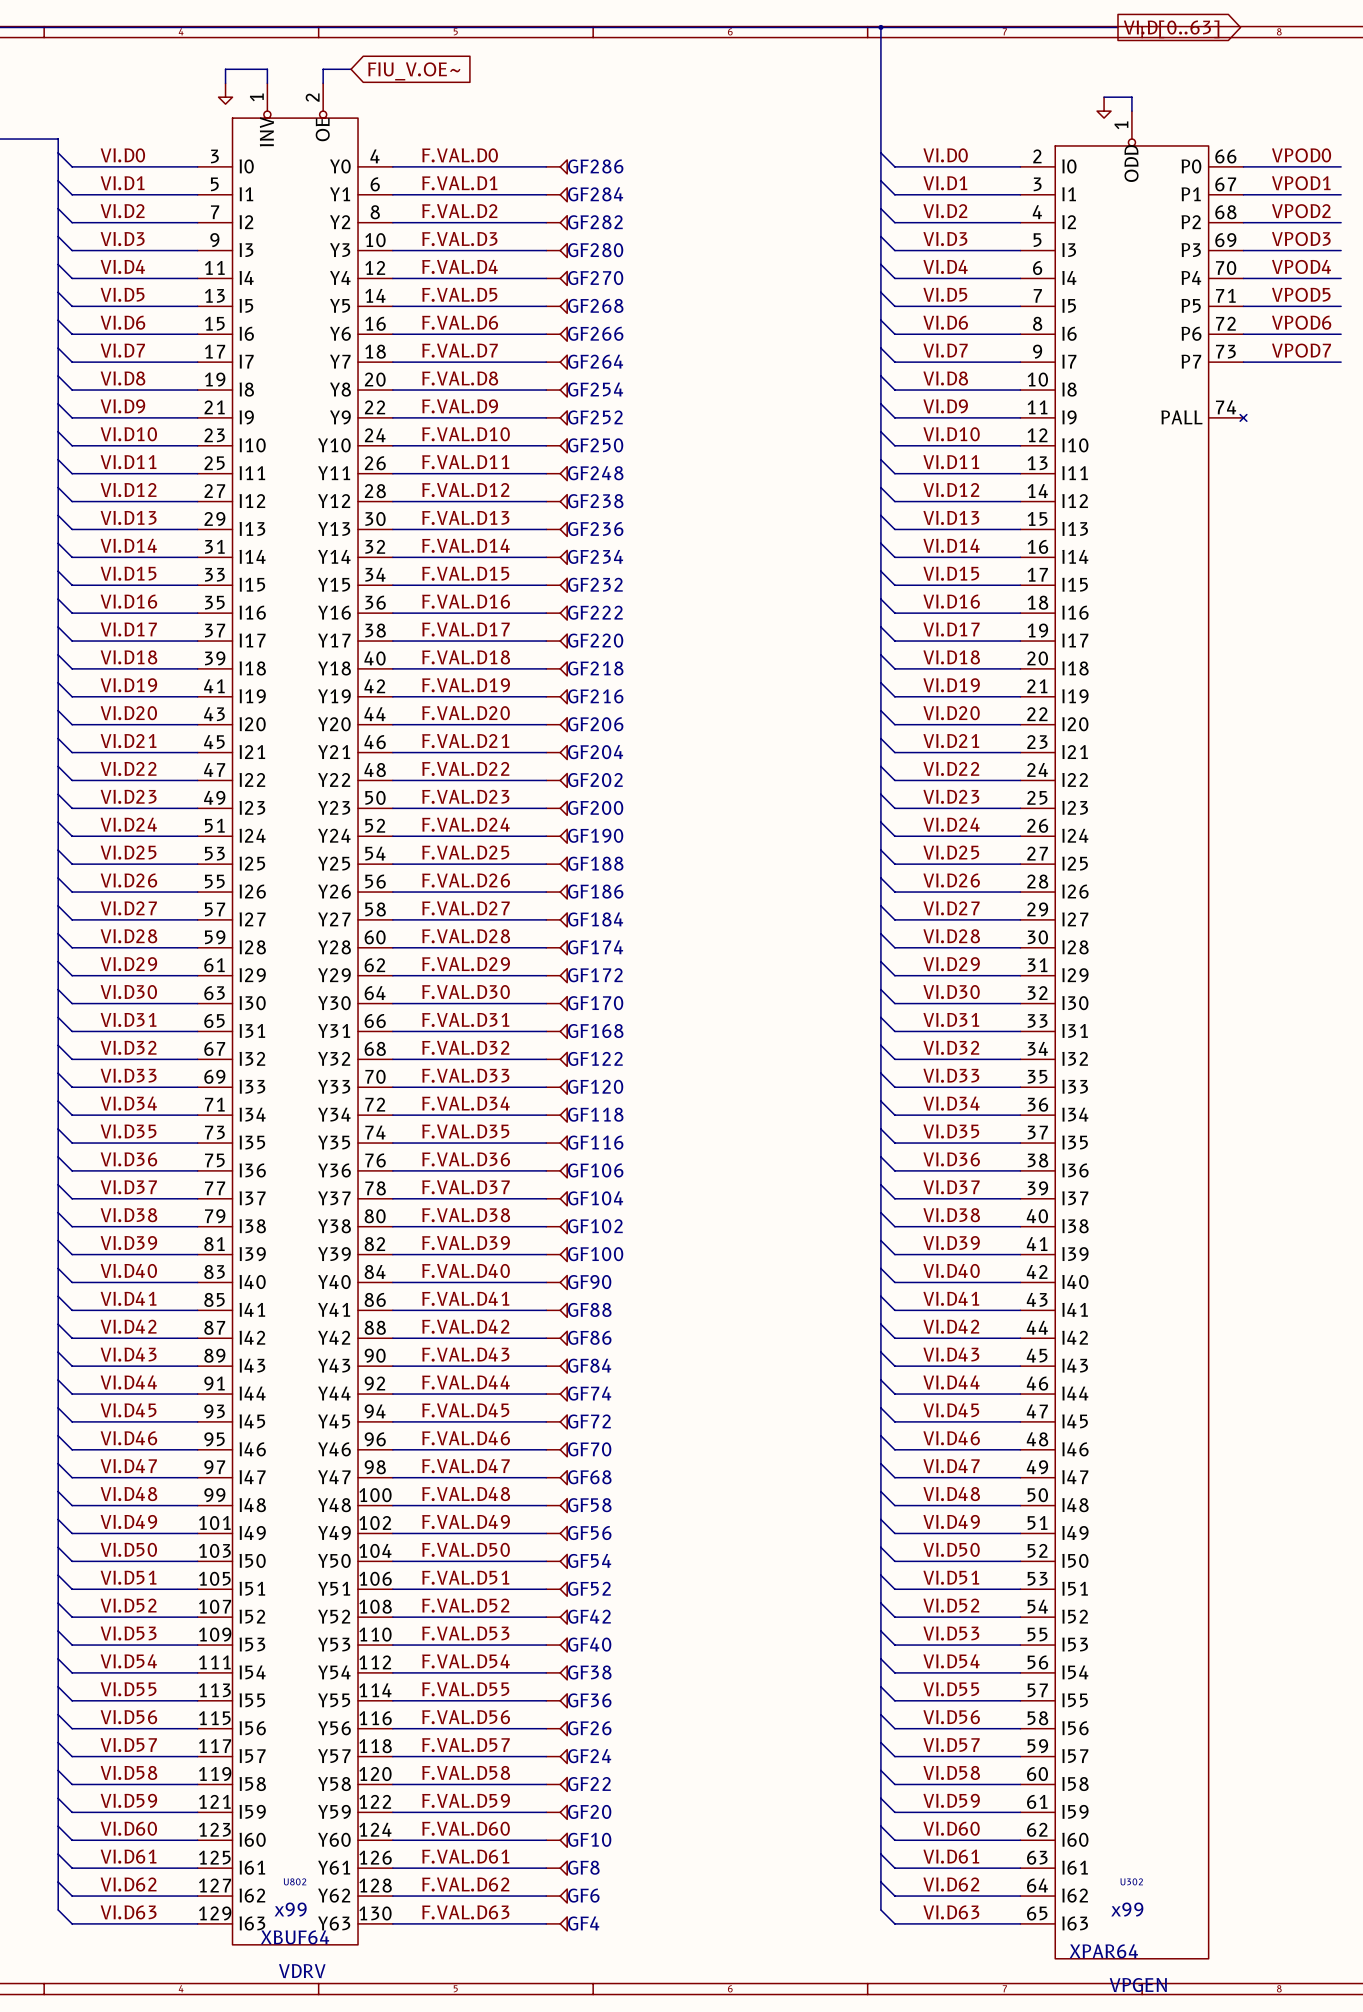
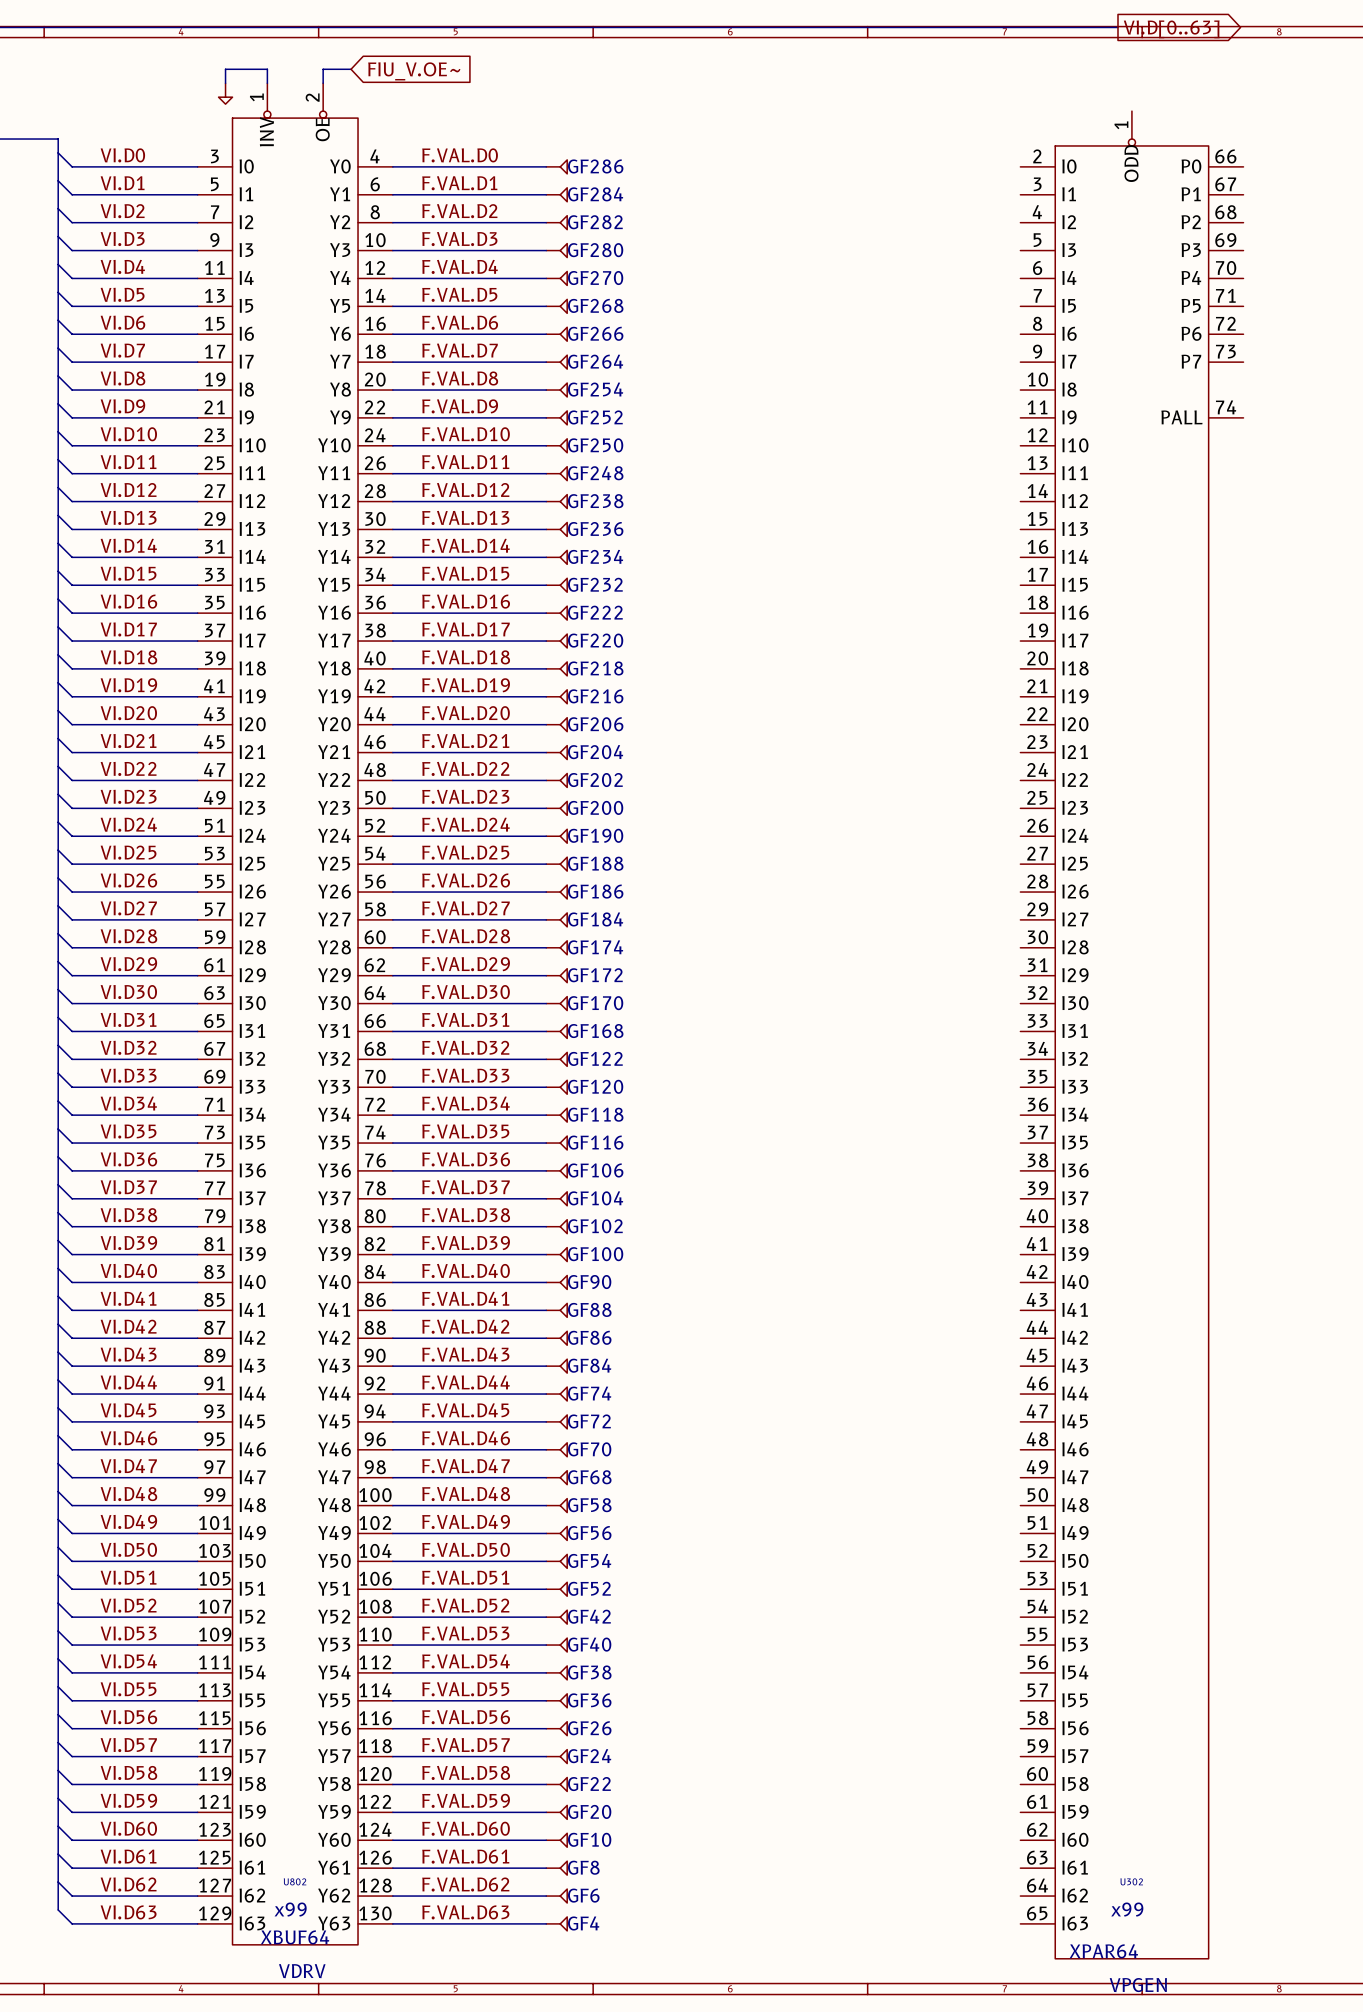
bus: (880, 27) (880, 1909) -> none
junction: (880, 27) -> none
wire: (1104, 97) (1131, 97) (1131, 111) -> none
power symbol: (1104, 107) -> none
wire: (880, 152) (894, 166) (1020, 166) -> none
label: VI.D0 (945, 155) -> none
label: VPOD0 (1301, 155) -> none
wire: (1243, 166) (1341, 166) -> none
wire: (880, 180) (894, 194) (1020, 194) -> none
label: VI.D1 (945, 183) -> none
label: VPOD1 (1301, 183) -> none
wire: (1243, 194) (1341, 194) -> none
wire: (880, 208) (894, 222) (1020, 222) -> none
label: VI.D2 (945, 211) -> none
label: VPOD2 (1301, 211) -> none
wire: (1243, 222) (1341, 222) -> none
wire: (880, 236) (894, 250) (1020, 250) -> none
label: VI.D3 (945, 239) -> none
label: VPOD3 (1301, 239) -> none
wire: (1243, 250) (1341, 250) -> none
wire: (880, 264) (894, 278) (1020, 278) -> none
label: VI.D4 (945, 266) -> none
label: VPOD4 (1301, 266) -> none
wire: (1243, 278) (1341, 278) -> none
wire: (880, 292) (894, 306) (1020, 306) -> none
label: VI.D5 (945, 294) -> none
label: VPOD5 (1301, 294) -> none
wire: (1243, 306) (1341, 306) -> none
wire: (880, 320) (894, 334) (1020, 334) -> none
label: VI.D6 (945, 322) -> none
label: VPOD6 (1301, 322) -> none
wire: (1243, 334) (1341, 334) -> none
wire: (880, 348) (894, 362) (1020, 362) -> none
label: VI.D7 (945, 350) -> none
label: VPOD7 (1301, 350) -> none
wire: (1243, 362) (1341, 362) -> none
wire: (880, 376) (894, 390) (1020, 390) -> none
label: VI.D8 (945, 378) -> none
wire: (880, 403) (894, 417) (1020, 417) -> none
label: VI.D9 (945, 406) -> none
no-connect mark: (1243, 417) -> none
wire: (880, 431) (894, 445) (1020, 445) -> none
label: VI.D10 (951, 434) -> none
wire: (880, 459) (894, 473) (1020, 473) -> none
label: VI.D11 (951, 462) -> none
wire: (880, 487) (894, 501) (1020, 501) -> none
label: VI.D12 (951, 490) -> none
wire: (880, 515) (894, 529) (1020, 529) -> none
label: VI.D13 (951, 517) -> none
wire: (880, 543) (894, 557) (1020, 557) -> none
label: VI.D14 (951, 545) -> none
wire: (880, 571) (894, 585) (1020, 585) -> none
label: VI.D15 (951, 573) -> none
wire: (880, 599) (894, 613) (1020, 613) -> none
label: VI.D16 (951, 601) -> none
wire: (880, 627) (894, 641) (1020, 641) -> none
label: VI.D17 (951, 629) -> none
wire: (880, 654) (894, 668) (1020, 668) -> none
label: VI.D18 (951, 657) -> none
wire: (880, 682) (894, 696) (1020, 696) -> none
label: VI.D19 (951, 685) -> none
wire: (880, 710) (894, 724) (1020, 724) -> none
label: VI.D20 (951, 713) -> none
wire: (880, 738) (894, 752) (1020, 752) -> none
label: VI.D21 (951, 741) -> none
wire: (880, 766) (894, 780) (1020, 780) -> none
label: VI.D22 (951, 768) -> none
wire: (880, 794) (894, 808) (1020, 808) -> none
label: VI.D23 (951, 796) -> none
wire: (880, 822) (894, 836) (1020, 836) -> none
label: VI.D24 (951, 824) -> none
wire: (880, 850) (894, 864) (1020, 864) -> none
label: VI.D25 (951, 852) -> none
wire: (880, 878) (894, 892) (1020, 892) -> none
label: VI.D26 (951, 880) -> none
wire: (880, 905) (894, 919) (1020, 919) -> none
label: VI.D27 (951, 908) -> none
wire: (880, 933) (894, 947) (1020, 947) -> none
label: VI.D28 (951, 936) -> none
wire: (880, 961) (894, 975) (1020, 975) -> none
label: VI.D29 (951, 964) -> none
wire: (880, 989) (894, 1003) (1020, 1003) -> none
label: VI.D30 (951, 992) -> none
wire: (880, 1017) (894, 1031) (1020, 1031) -> none
label: VI.D31 (951, 1019) -> none
wire: (880, 1045) (894, 1059) (1020, 1059) -> none
label: VI.D32 (951, 1047) -> none
wire: (880, 1073) (894, 1087) (1020, 1087) -> none
label: VI.D33 (951, 1075) -> none
wire: (880, 1101) (894, 1115) (1020, 1115) -> none
label: VI.D34 (951, 1103) -> none
wire: (880, 1129) (894, 1143) (1020, 1143) -> none
label: VI.D35 (951, 1131) -> none
wire: (880, 1156) (894, 1170) (1020, 1170) -> none
label: VI.D36 (951, 1159) -> none
wire: (880, 1184) (894, 1198) (1020, 1198) -> none
label: VI.D37 (951, 1187) -> none
wire: (880, 1212) (894, 1226) (1020, 1226) -> none
label: VI.D38 (951, 1215) -> none
wire: (880, 1240) (894, 1254) (1020, 1254) -> none
label: VI.D39 (951, 1243) -> none
wire: (880, 1268) (894, 1282) (1020, 1282) -> none
label: VI.D40 (951, 1270) -> none
wire: (880, 1296) (894, 1310) (1020, 1310) -> none
label: VI.D41 (951, 1298) -> none
wire: (880, 1324) (894, 1338) (1020, 1338) -> none
label: VI.D42 (951, 1326) -> none
wire: (880, 1352) (894, 1366) (1020, 1366) -> none
label: VI.D43 (951, 1354) -> none
wire: (880, 1380) (894, 1394) (1020, 1394) -> none
label: VI.D44 (951, 1382) -> none
wire: (880, 1407) (894, 1421) (1020, 1421) -> none
label: VI.D45 (951, 1410) -> none
wire: (880, 1435) (894, 1449) (1020, 1449) -> none
label: VI.D46 (951, 1438) -> none
wire: (880, 1463) (894, 1477) (1020, 1477) -> none
label: VI.D47 (951, 1466) -> none
wire: (880, 1491) (894, 1505) (1020, 1505) -> none
label: VI.D48 (951, 1494) -> none
wire: (880, 1519) (894, 1533) (1020, 1533) -> none
label: VI.D49 (951, 1521) -> none
wire: (880, 1547) (894, 1561) (1020, 1561) -> none
label: VI.D50 (951, 1549) -> none
wire: (880, 1575) (894, 1589) (1020, 1589) -> none
label: VI.D51 (951, 1577) -> none
wire: (880, 1603) (894, 1617) (1020, 1617) -> none
label: VI.D52 (951, 1605) -> none
wire: (880, 1631) (894, 1645) (1020, 1645) -> none
label: VI.D53 (951, 1633) -> none
wire: (880, 1658) (894, 1672) (1020, 1672) -> none
label: VI.D54 (951, 1661) -> none
wire: (880, 1686) (894, 1700) (1020, 1700) -> none
label: VI.D55 (951, 1689) -> none
wire: (880, 1714) (894, 1728) (1020, 1728) -> none
label: VI.D56 (951, 1717) -> none
wire: (880, 1742) (894, 1756) (1020, 1756) -> none
label: VI.D57 (951, 1745) -> none
wire: (880, 1770) (894, 1784) (1020, 1784) -> none
label: VI.D58 (951, 1772) -> none
wire: (880, 1798) (894, 1812) (1020, 1812) -> none
label: VI.D59 (951, 1800) -> none
wire: (880, 1826) (894, 1840) (1020, 1840) -> none
label: VI.D60 (951, 1828) -> none
wire: (880, 1854) (894, 1868) (1020, 1868) -> none
label: VI.D61 (951, 1856) -> none
wire: (880, 1882) (894, 1896) (1020, 1896) -> none
label: VI.D62 (951, 1884) -> none
wire: (880, 1909) (894, 1923) (1020, 1923) -> none
label: VI.D63 (951, 1912) -> none

